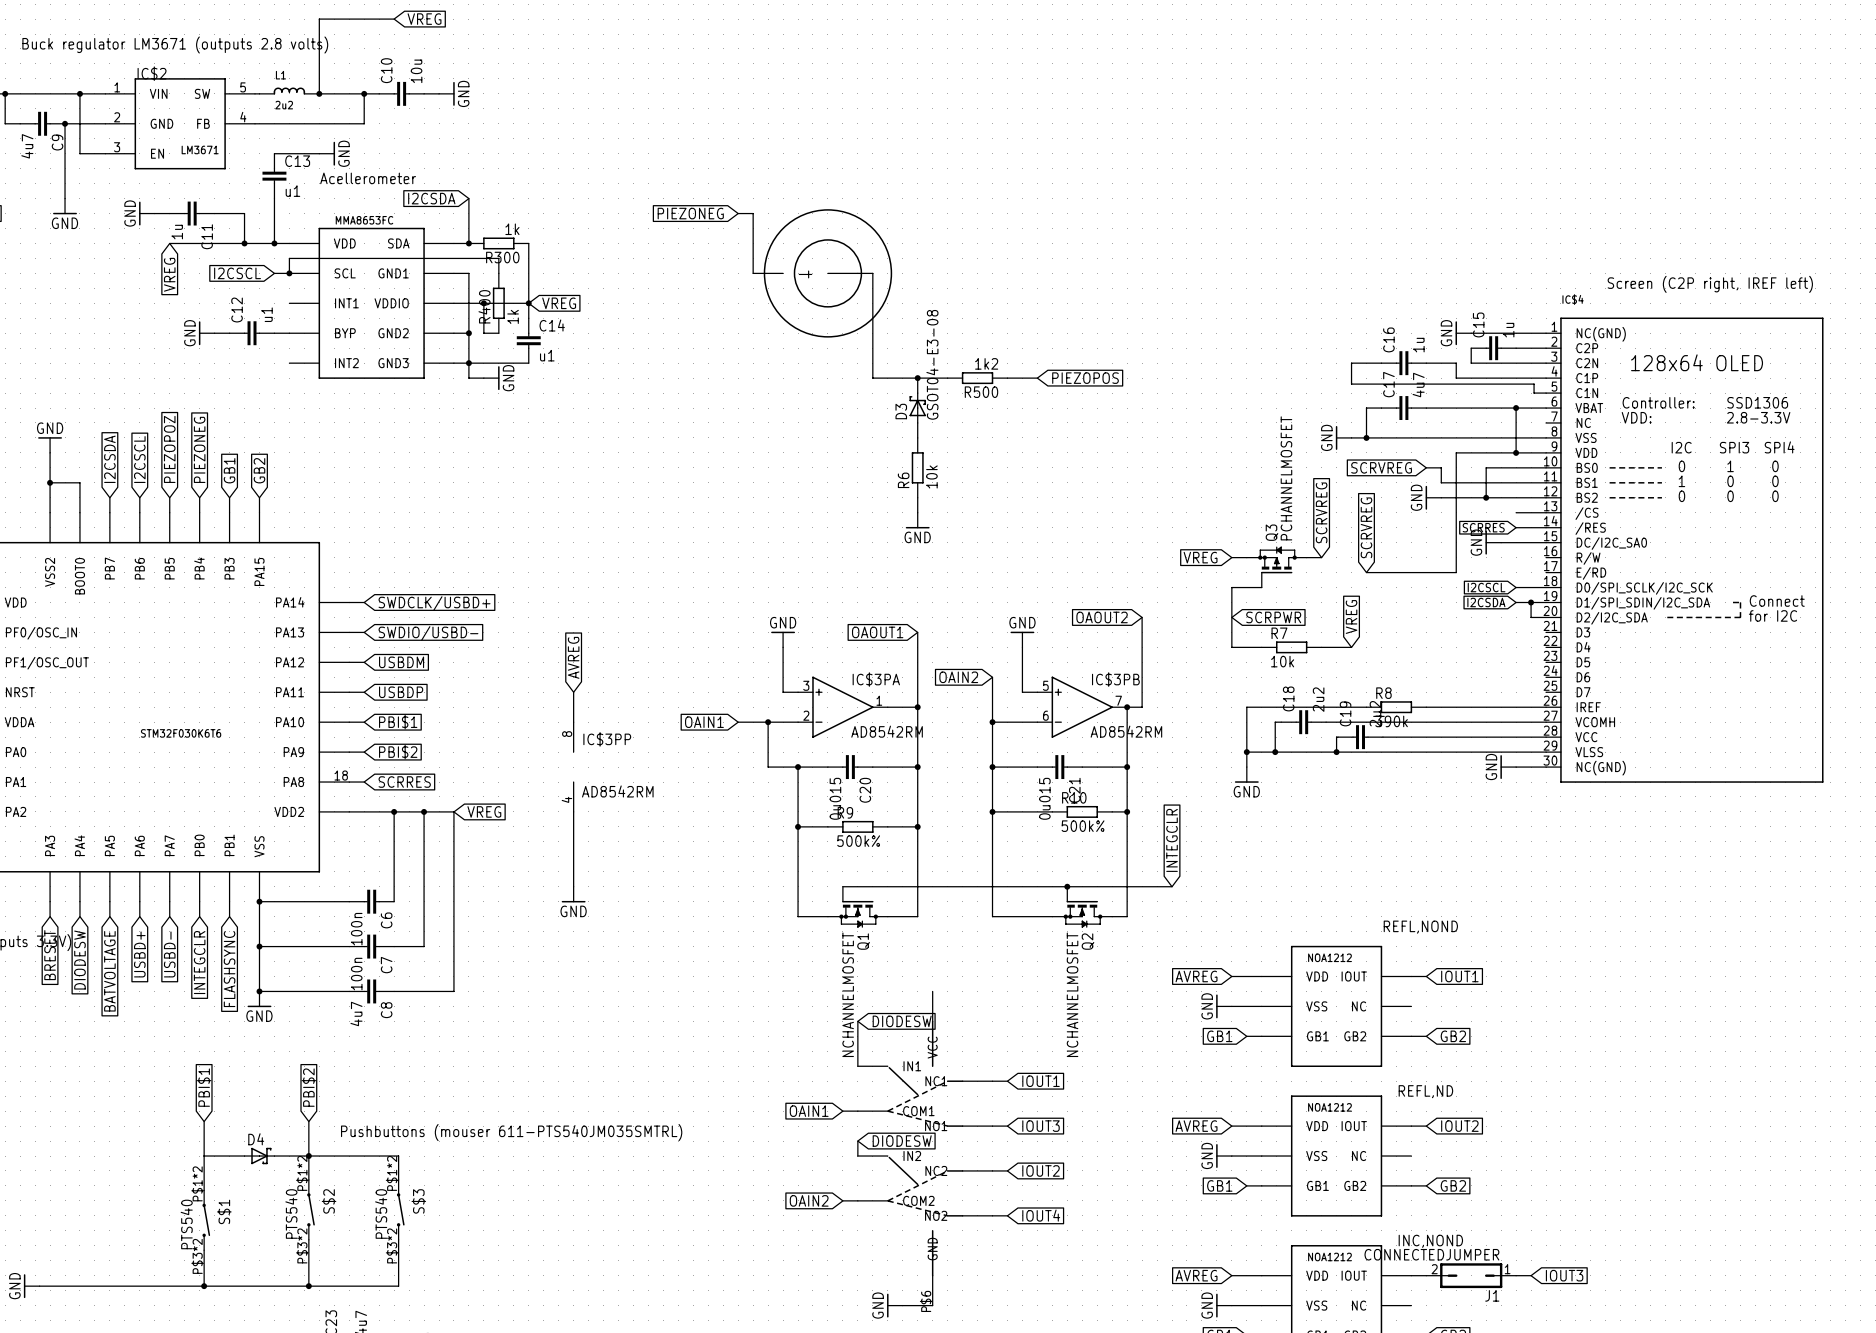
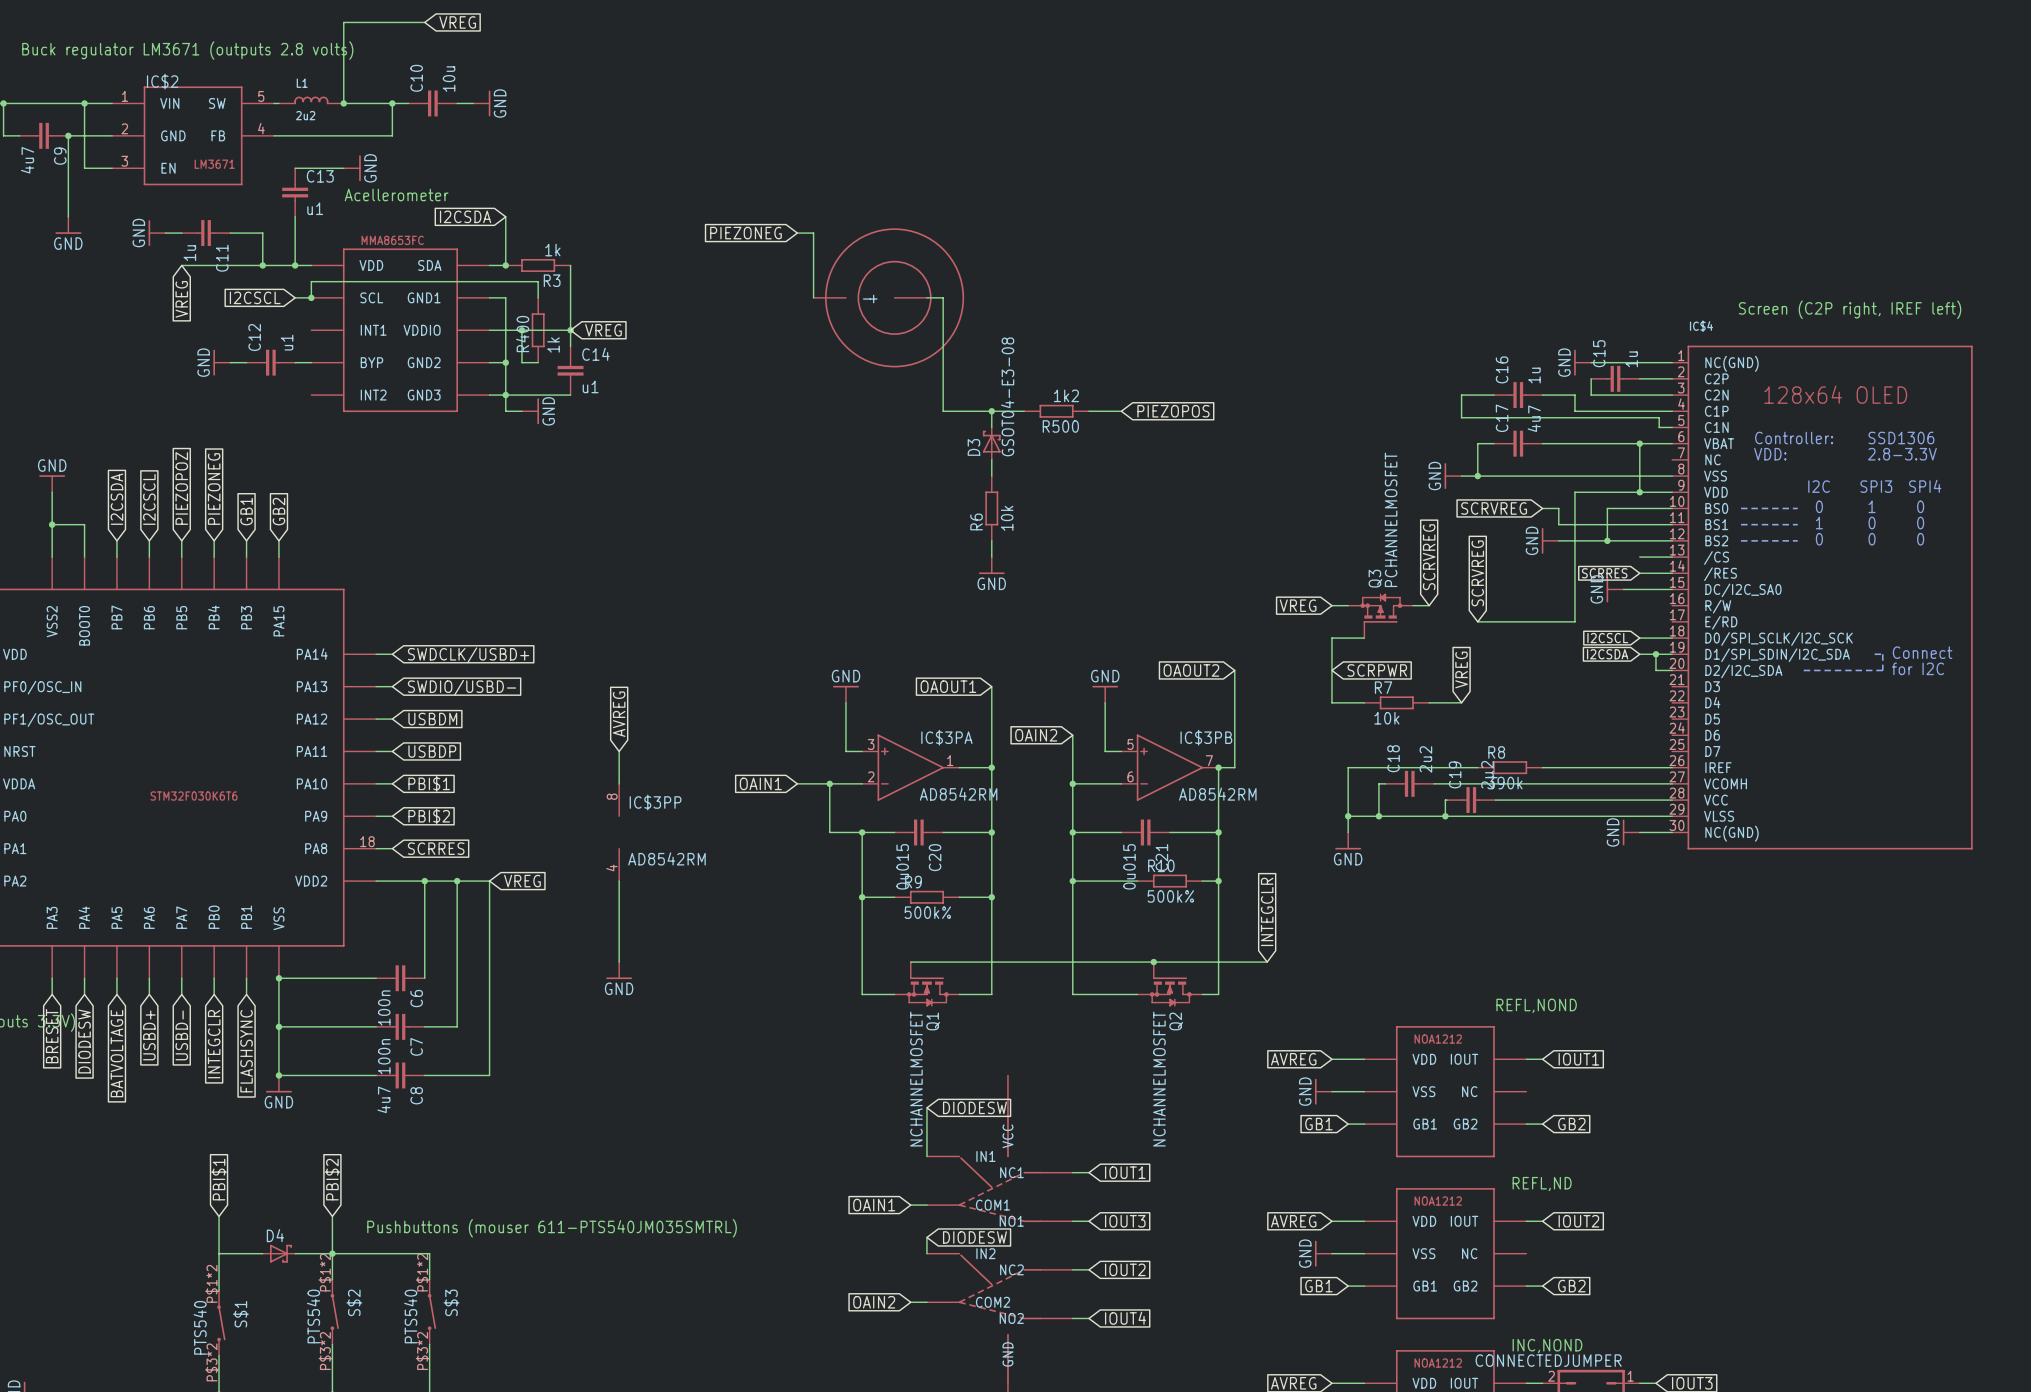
R300 name: R300 (502, 257) -> R3 (552, 280)

